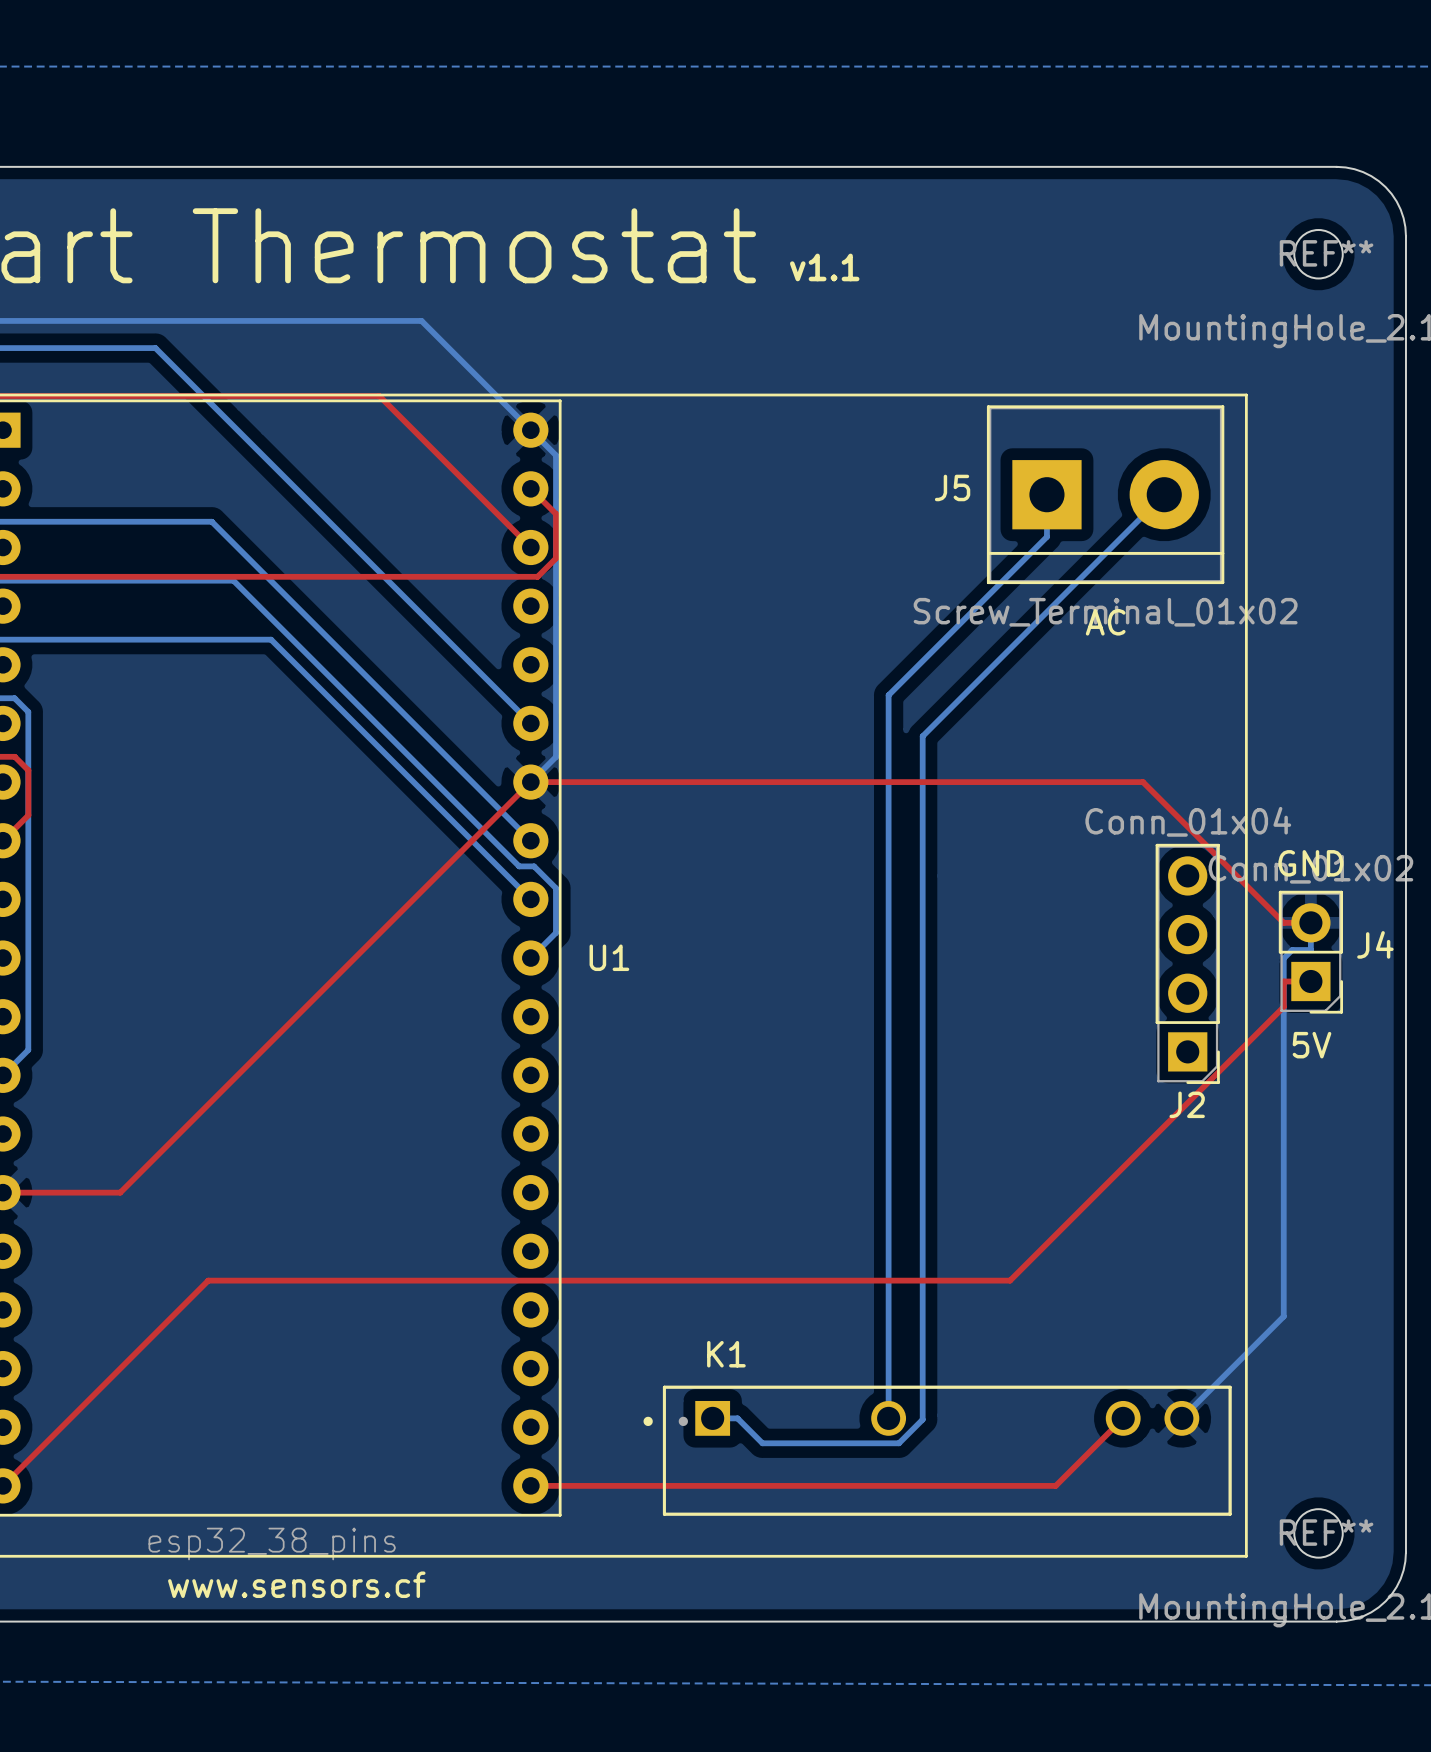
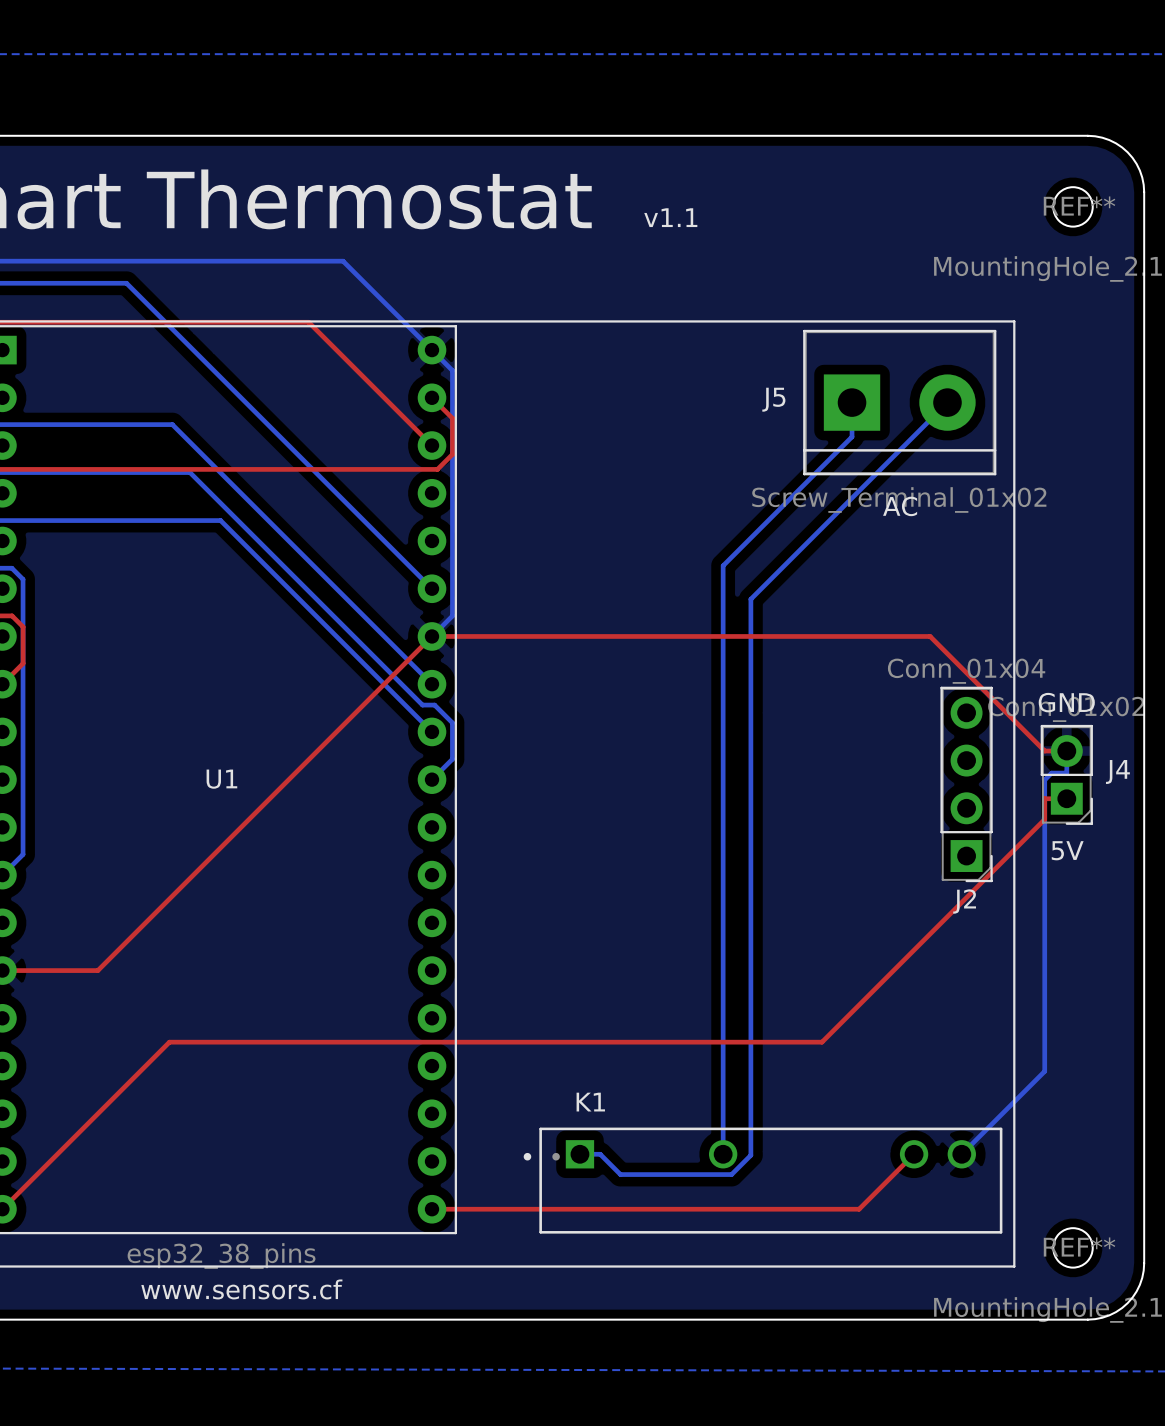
U1 name position: U1 (609, 957) -> U1 (221, 779)

